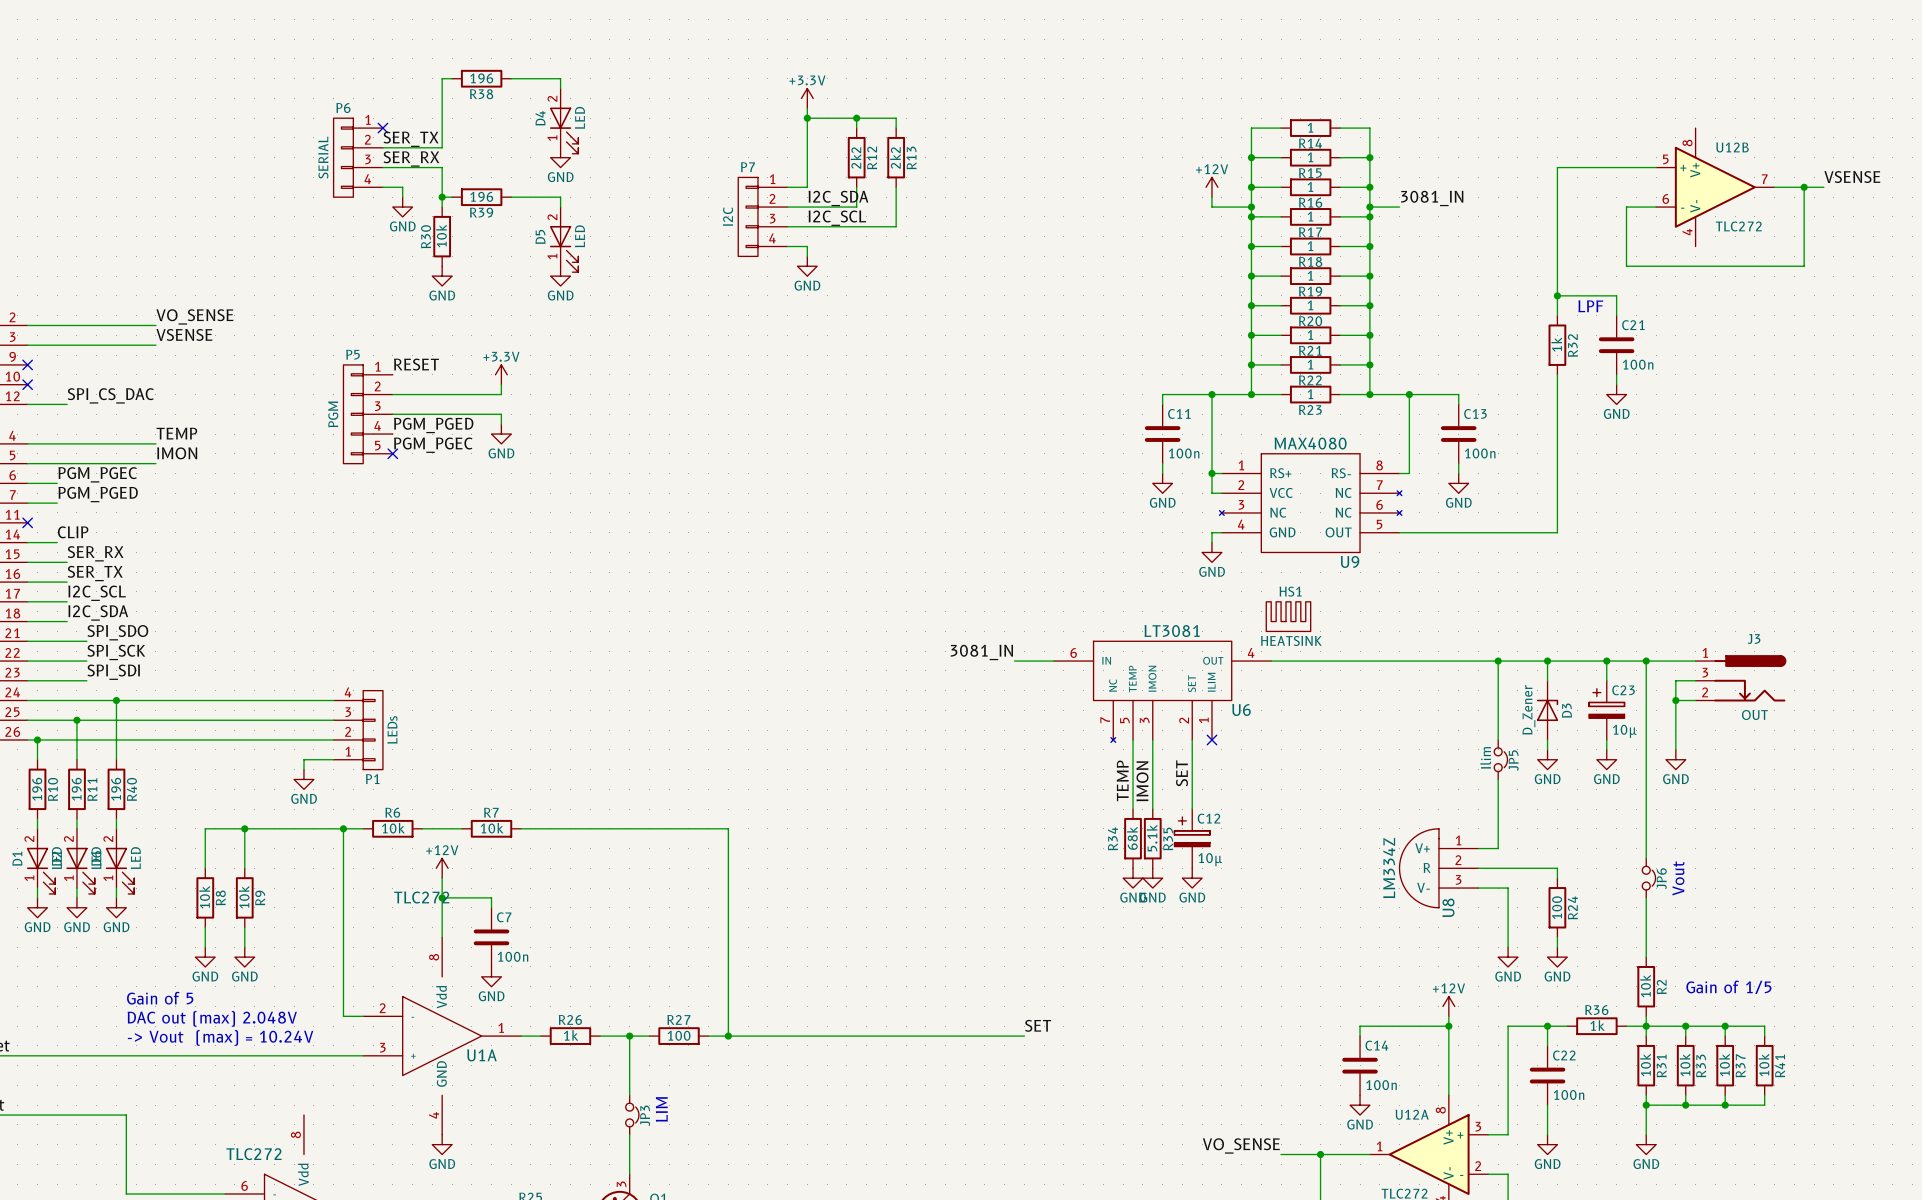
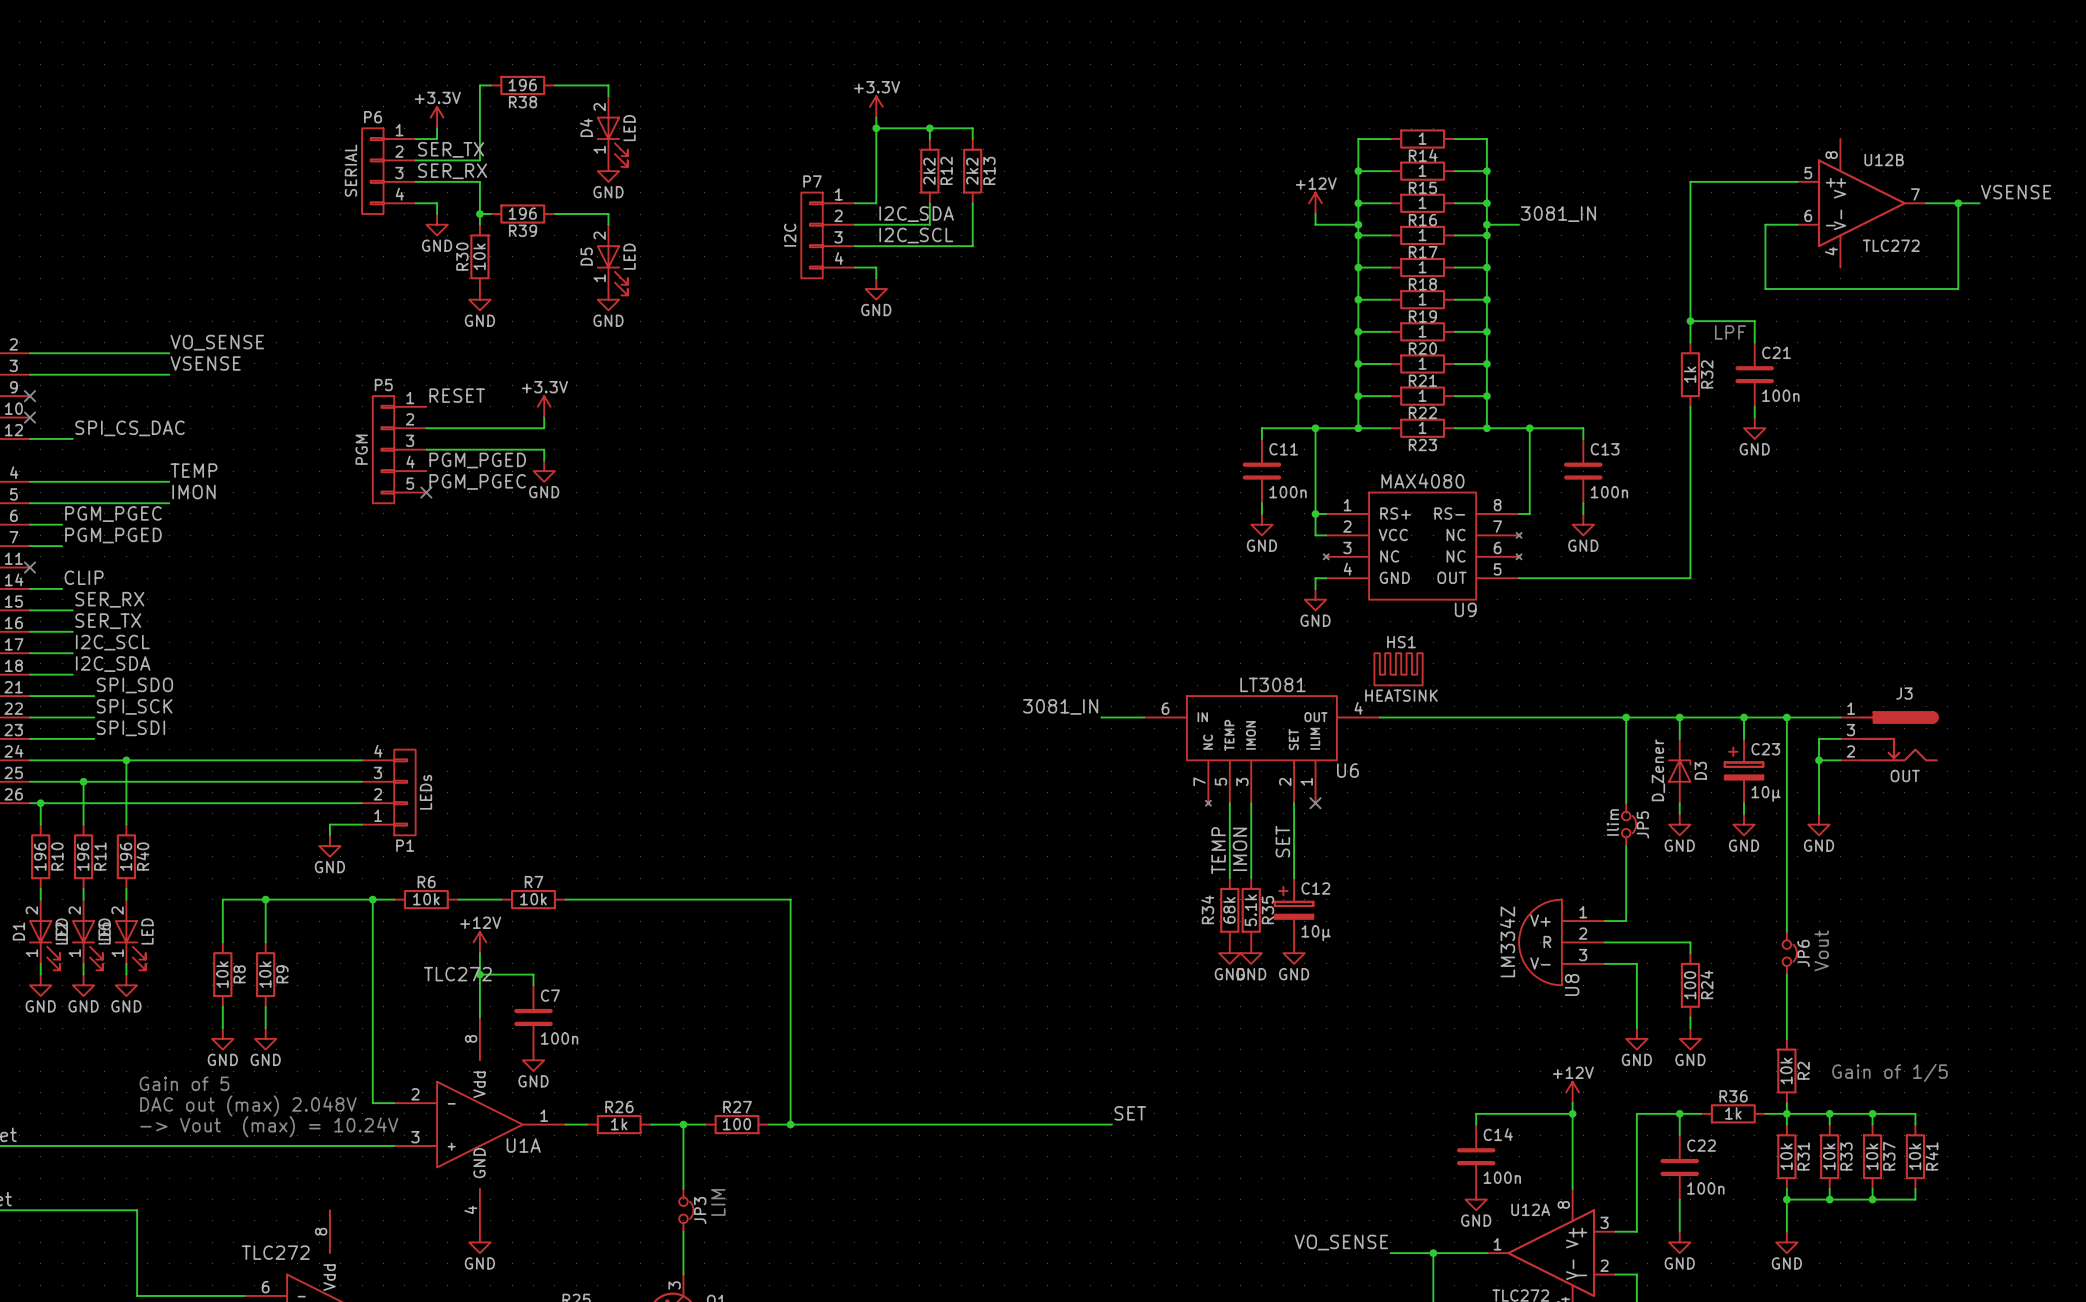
power symbol: none -> +3.3V (437, 117)
wire: none -> (437, 128) (437, 139) (415, 139)
no-connect mark: (382, 128) -> none

